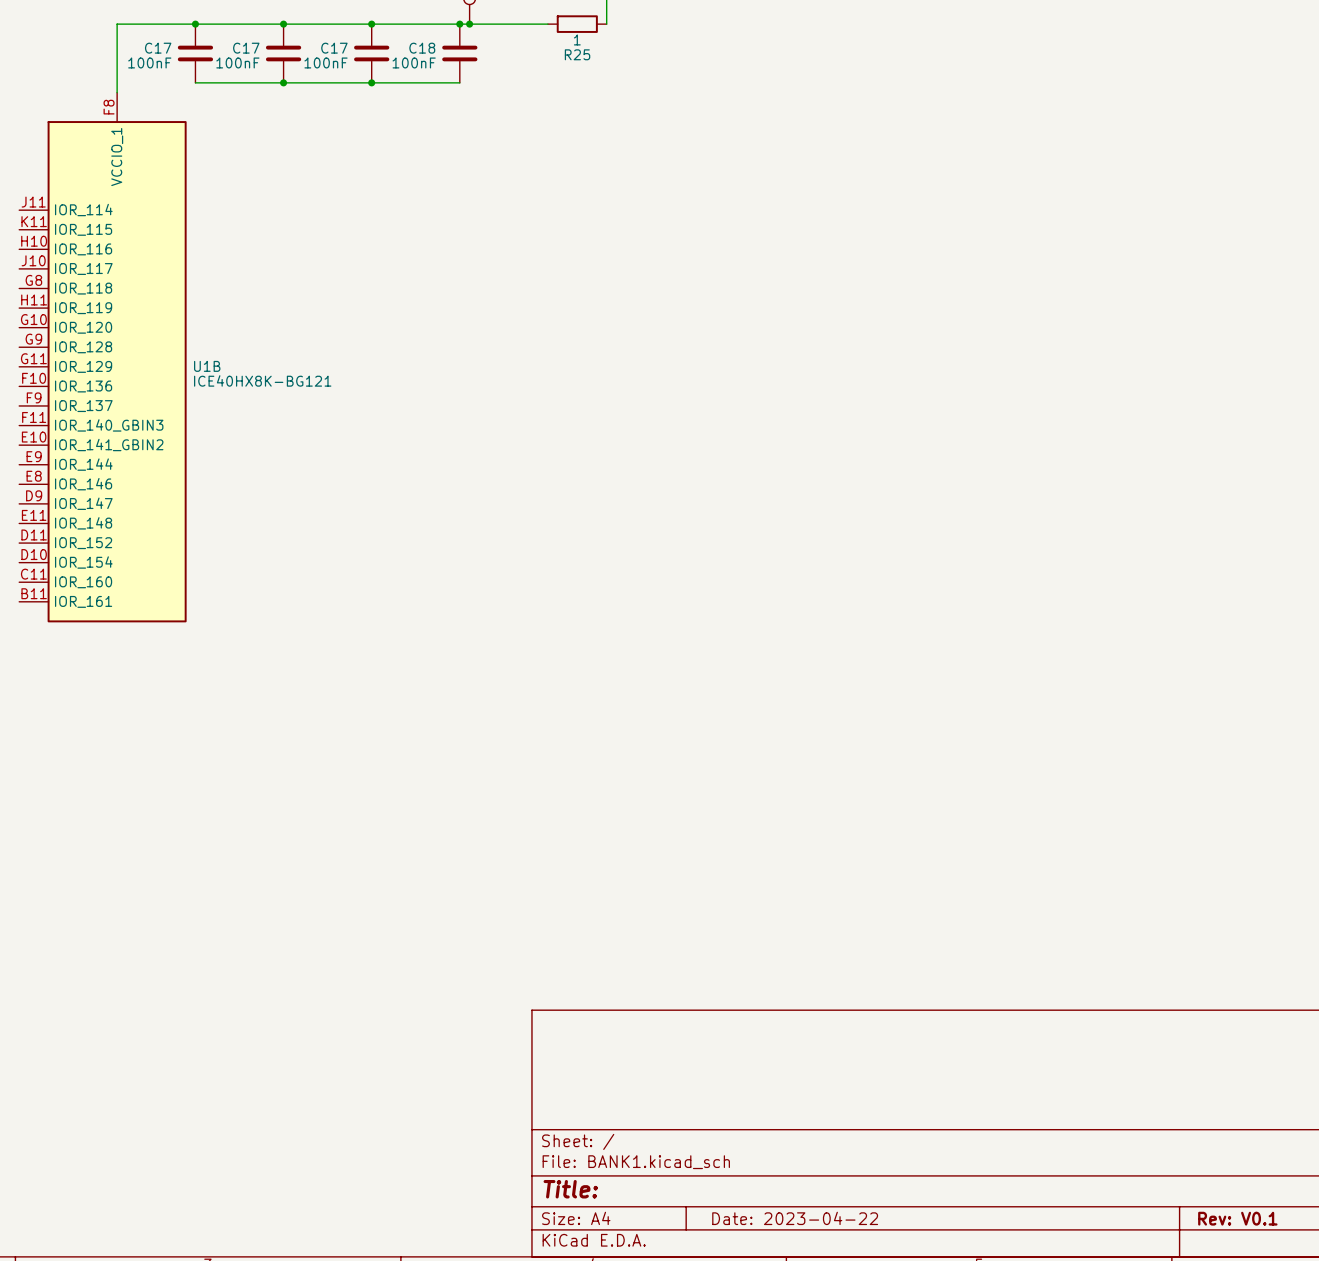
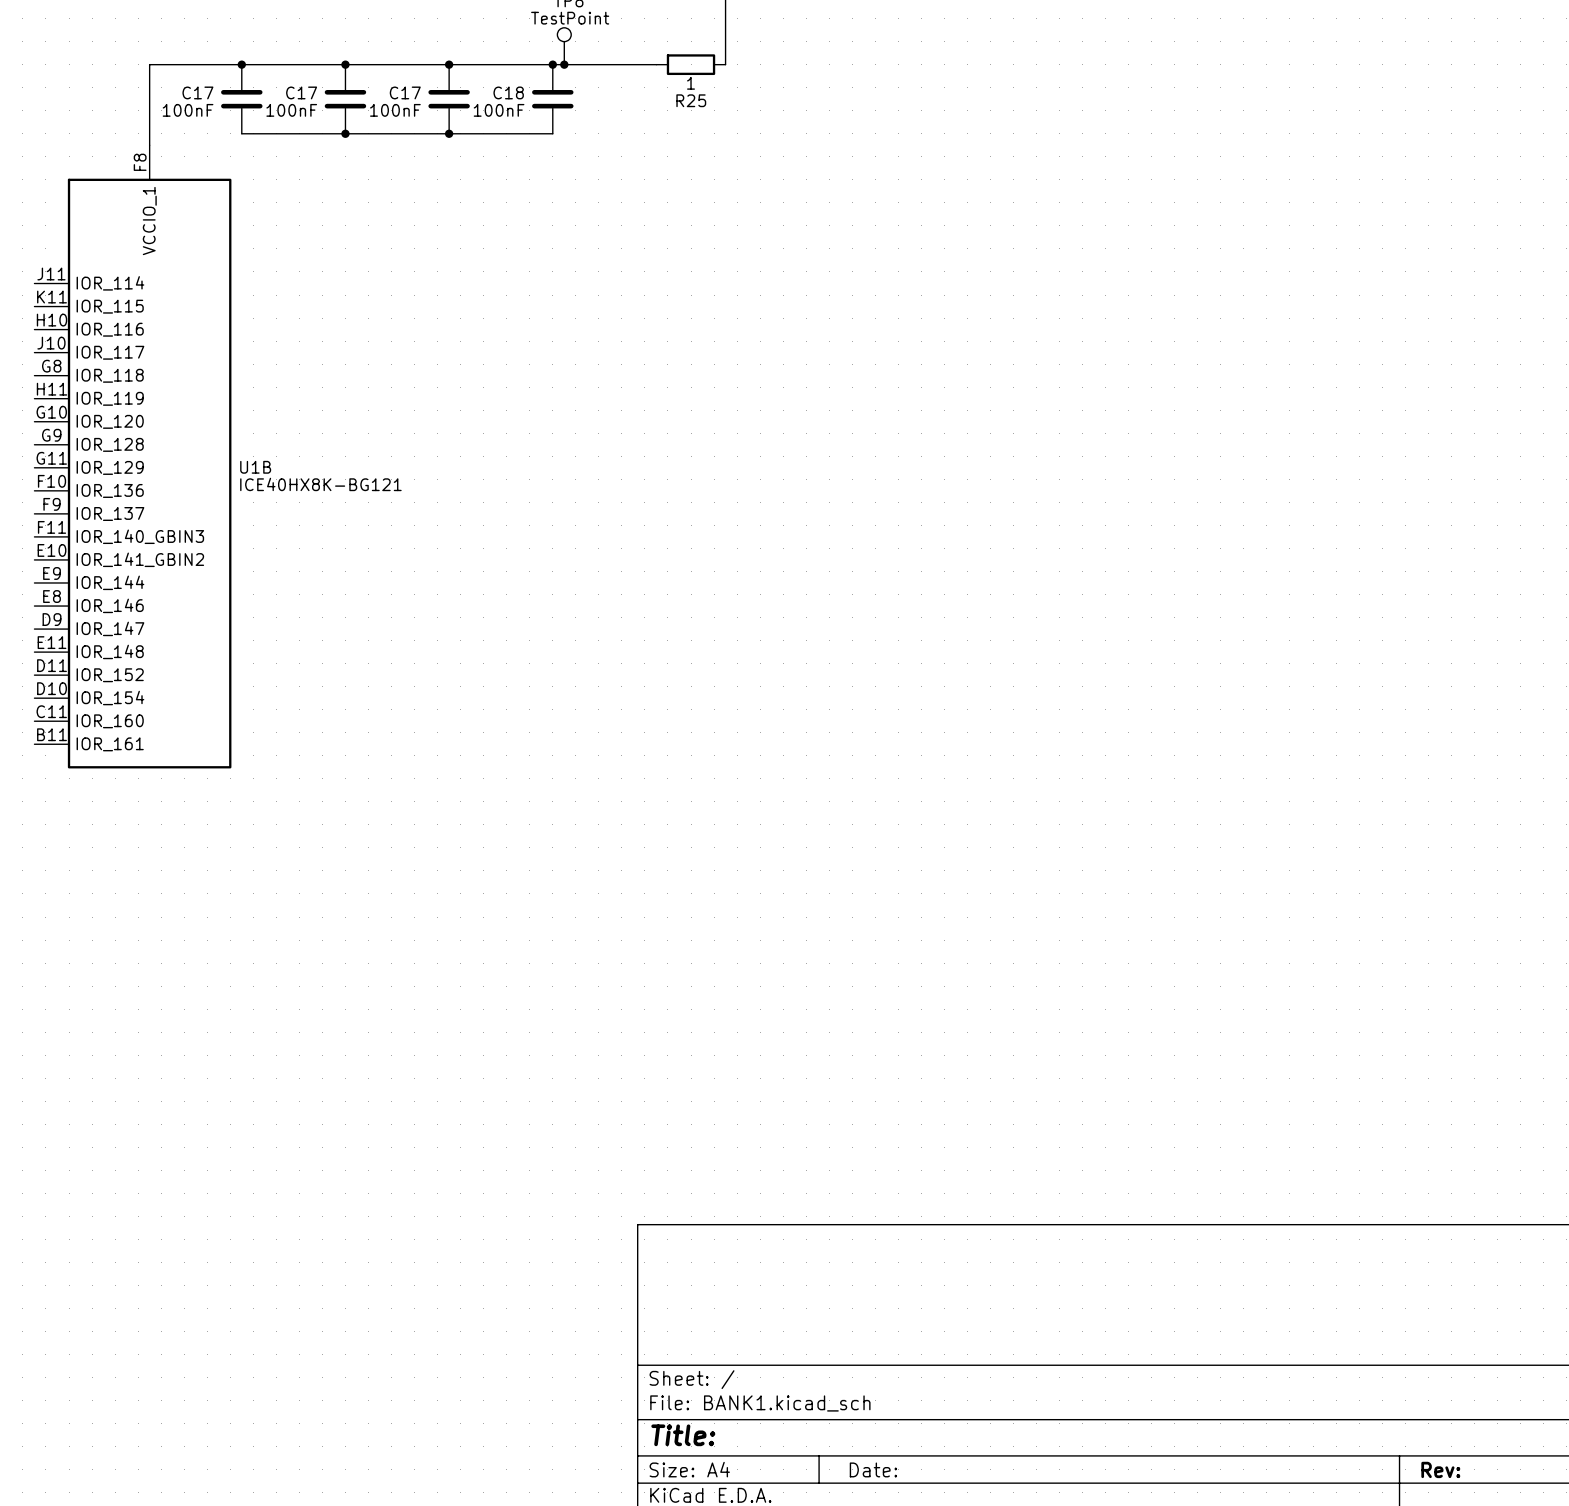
title block: Date: 2023-04-22 (795, 1218) -> Date: (873, 1469)
title block: Rev: V0.1 (1237, 1218) -> Rev: (1440, 1469)

